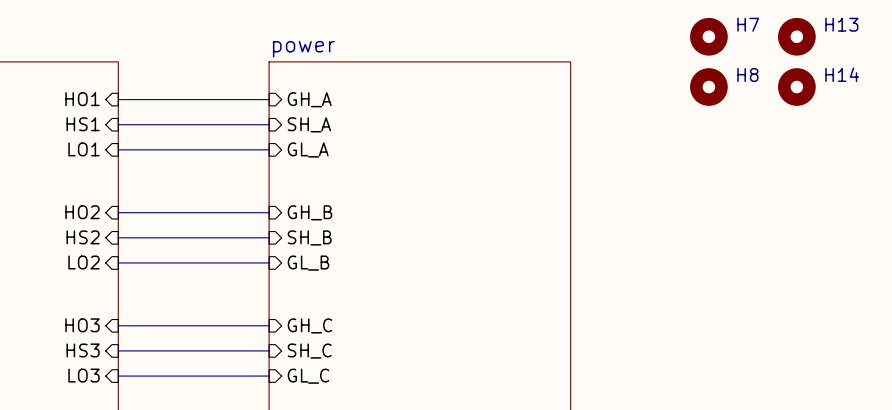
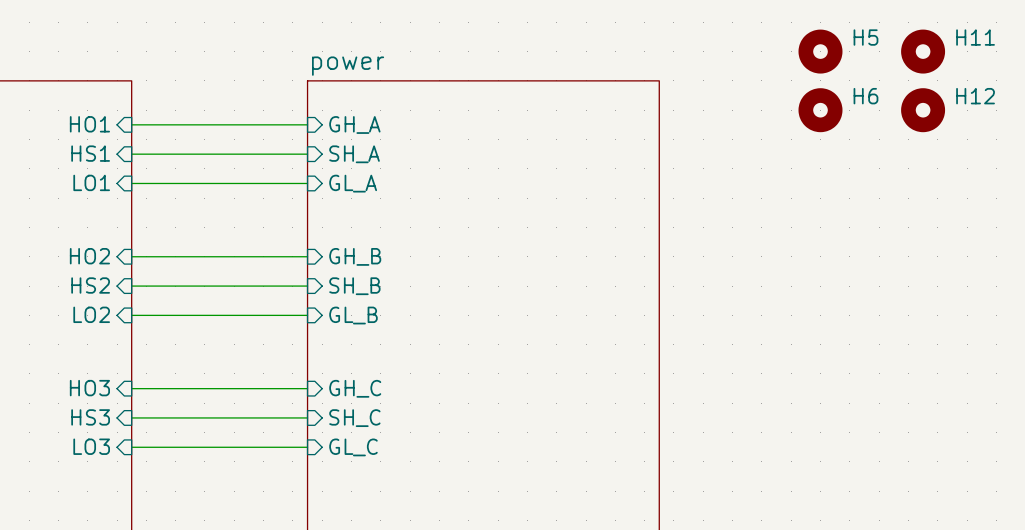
H7 name: H7 (748, 24) -> H5 (865, 37)
H13 name: H13 (841, 24) -> H11 (975, 37)
H14 name: H14 (842, 74) -> H12 (975, 96)
H8 name: H8 (747, 75) -> H6 (865, 96)

